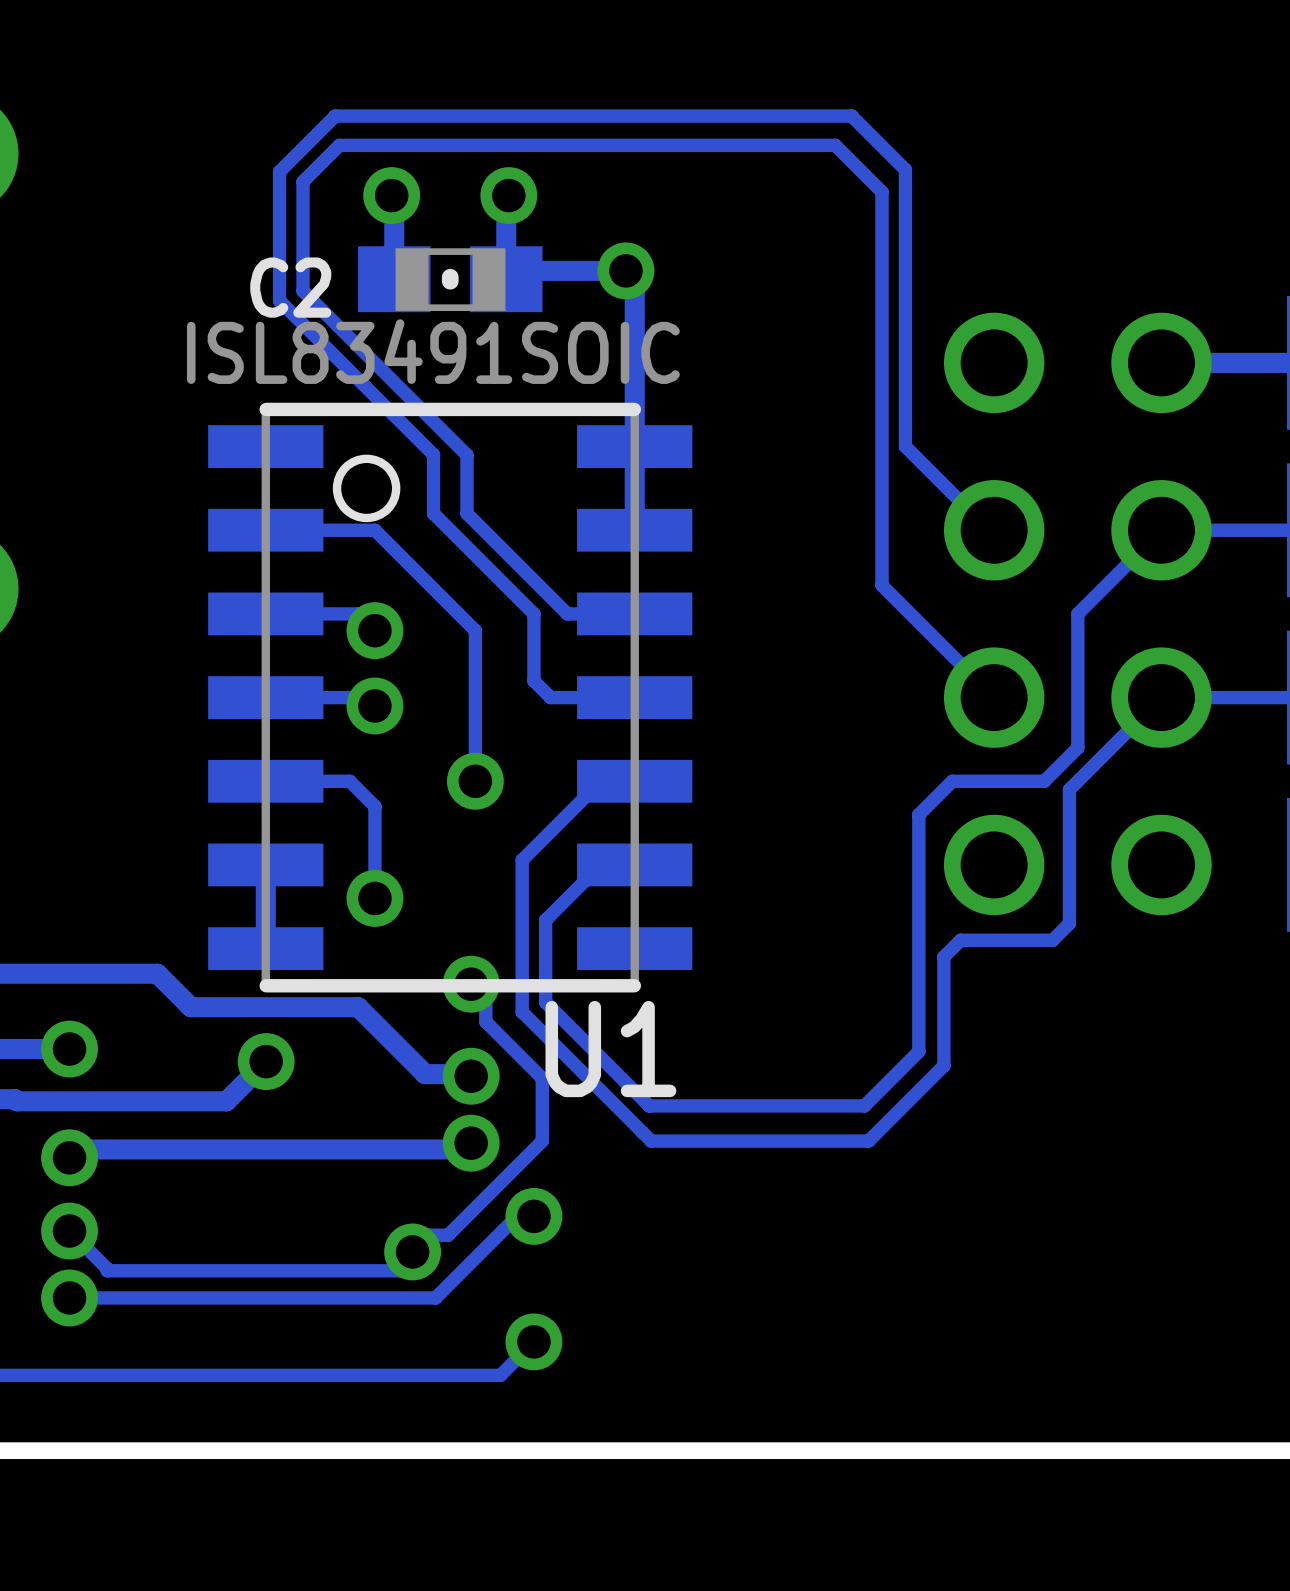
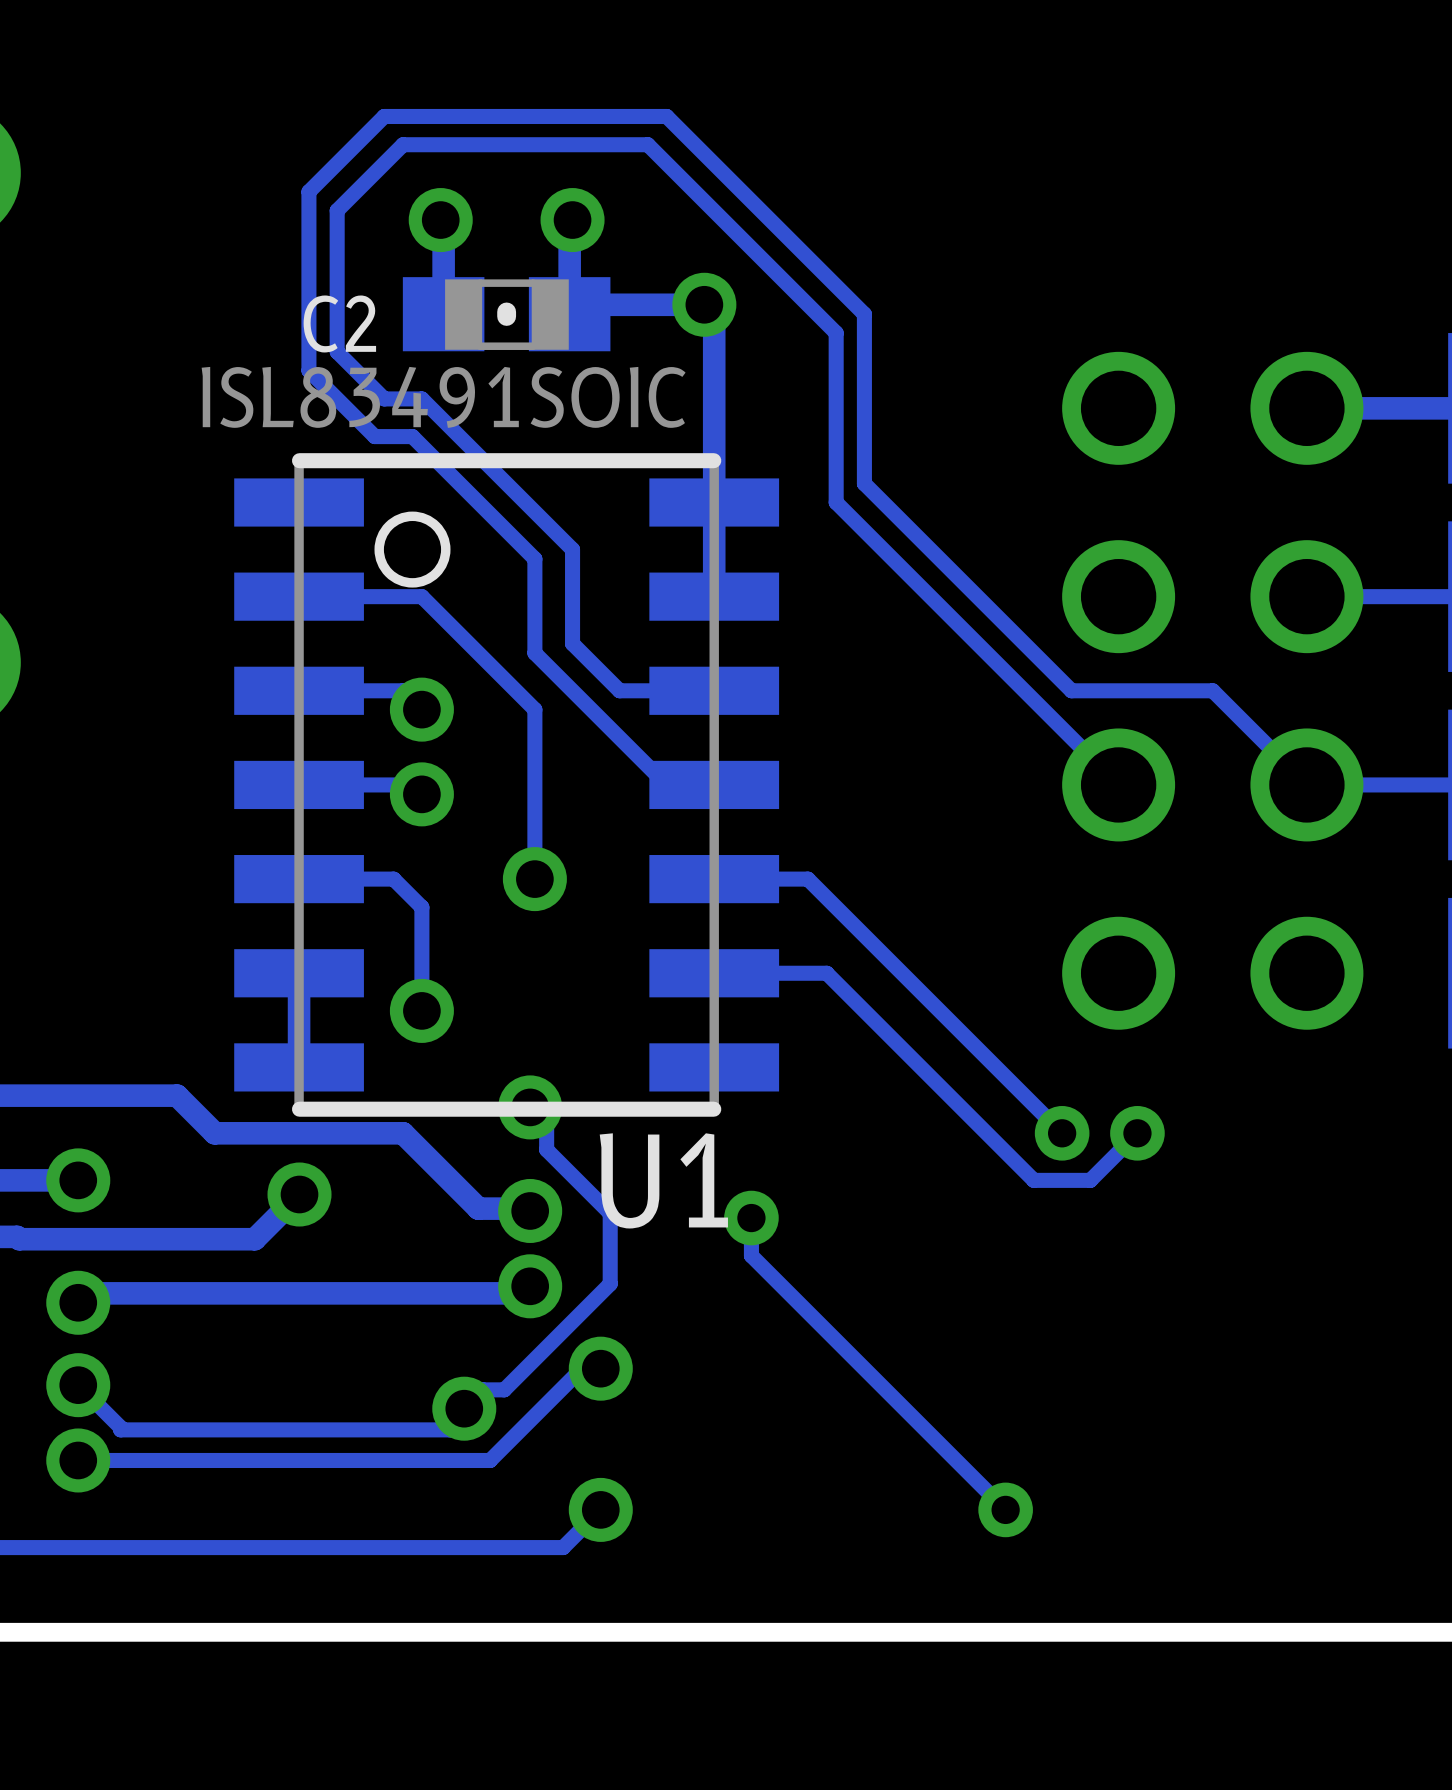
track: (366, 388) (279, 300) (279, 171) (335, 116) (851, 116) (905, 169) (905, 446) (989, 530) (994, 530) -> (412, 436) (374, 436) (308, 370) (308, 191) (384, 116) (666, 116) (864, 314) (864, 483) (1071, 690) (1212, 690) (1306, 784)
track: (433, 454) (433, 513) (533, 613) (533, 680) (550, 697) (592, 697) -> (487, 511) (534, 558) (534, 653) (666, 784)
track: (1161, 530) (1077, 613) (1077, 747) (1044, 781) (952, 781) (918, 814) (918, 1051) (864, 1105) (649, 1105) (545, 1002) (545, 920) (600, 864) (634, 864) -> (1137, 1133) (1090, 1180) (1033, 1180) (826, 973) (714, 973)
track: (882, 585) (882, 192) (835, 145) (339, 145) (303, 181) (303, 291) (467, 455) (467, 513) (567, 613) -> (992, 658) (836, 502) (836, 333) (647, 144) (403, 144) (337, 210) (337, 351) (384, 398) (421, 398) (572, 549) (572, 643) (619, 690) (638, 690)
track: (1161, 697) (1069, 789) (1069, 923) (1052, 940) (960, 940) (943, 956) (943, 1065) (868, 1141) (651, 1141) (522, 1012) (522, 860) (601, 781) (634, 781) -> (1062, 1133) (807, 879) (714, 879)
via: none -> (1062, 1133)
via: none -> (1137, 1133)
track: none -> (751, 1218) (751, 1255) (1005, 1509)
via: none -> (751, 1218)
via: none -> (1005, 1509)

